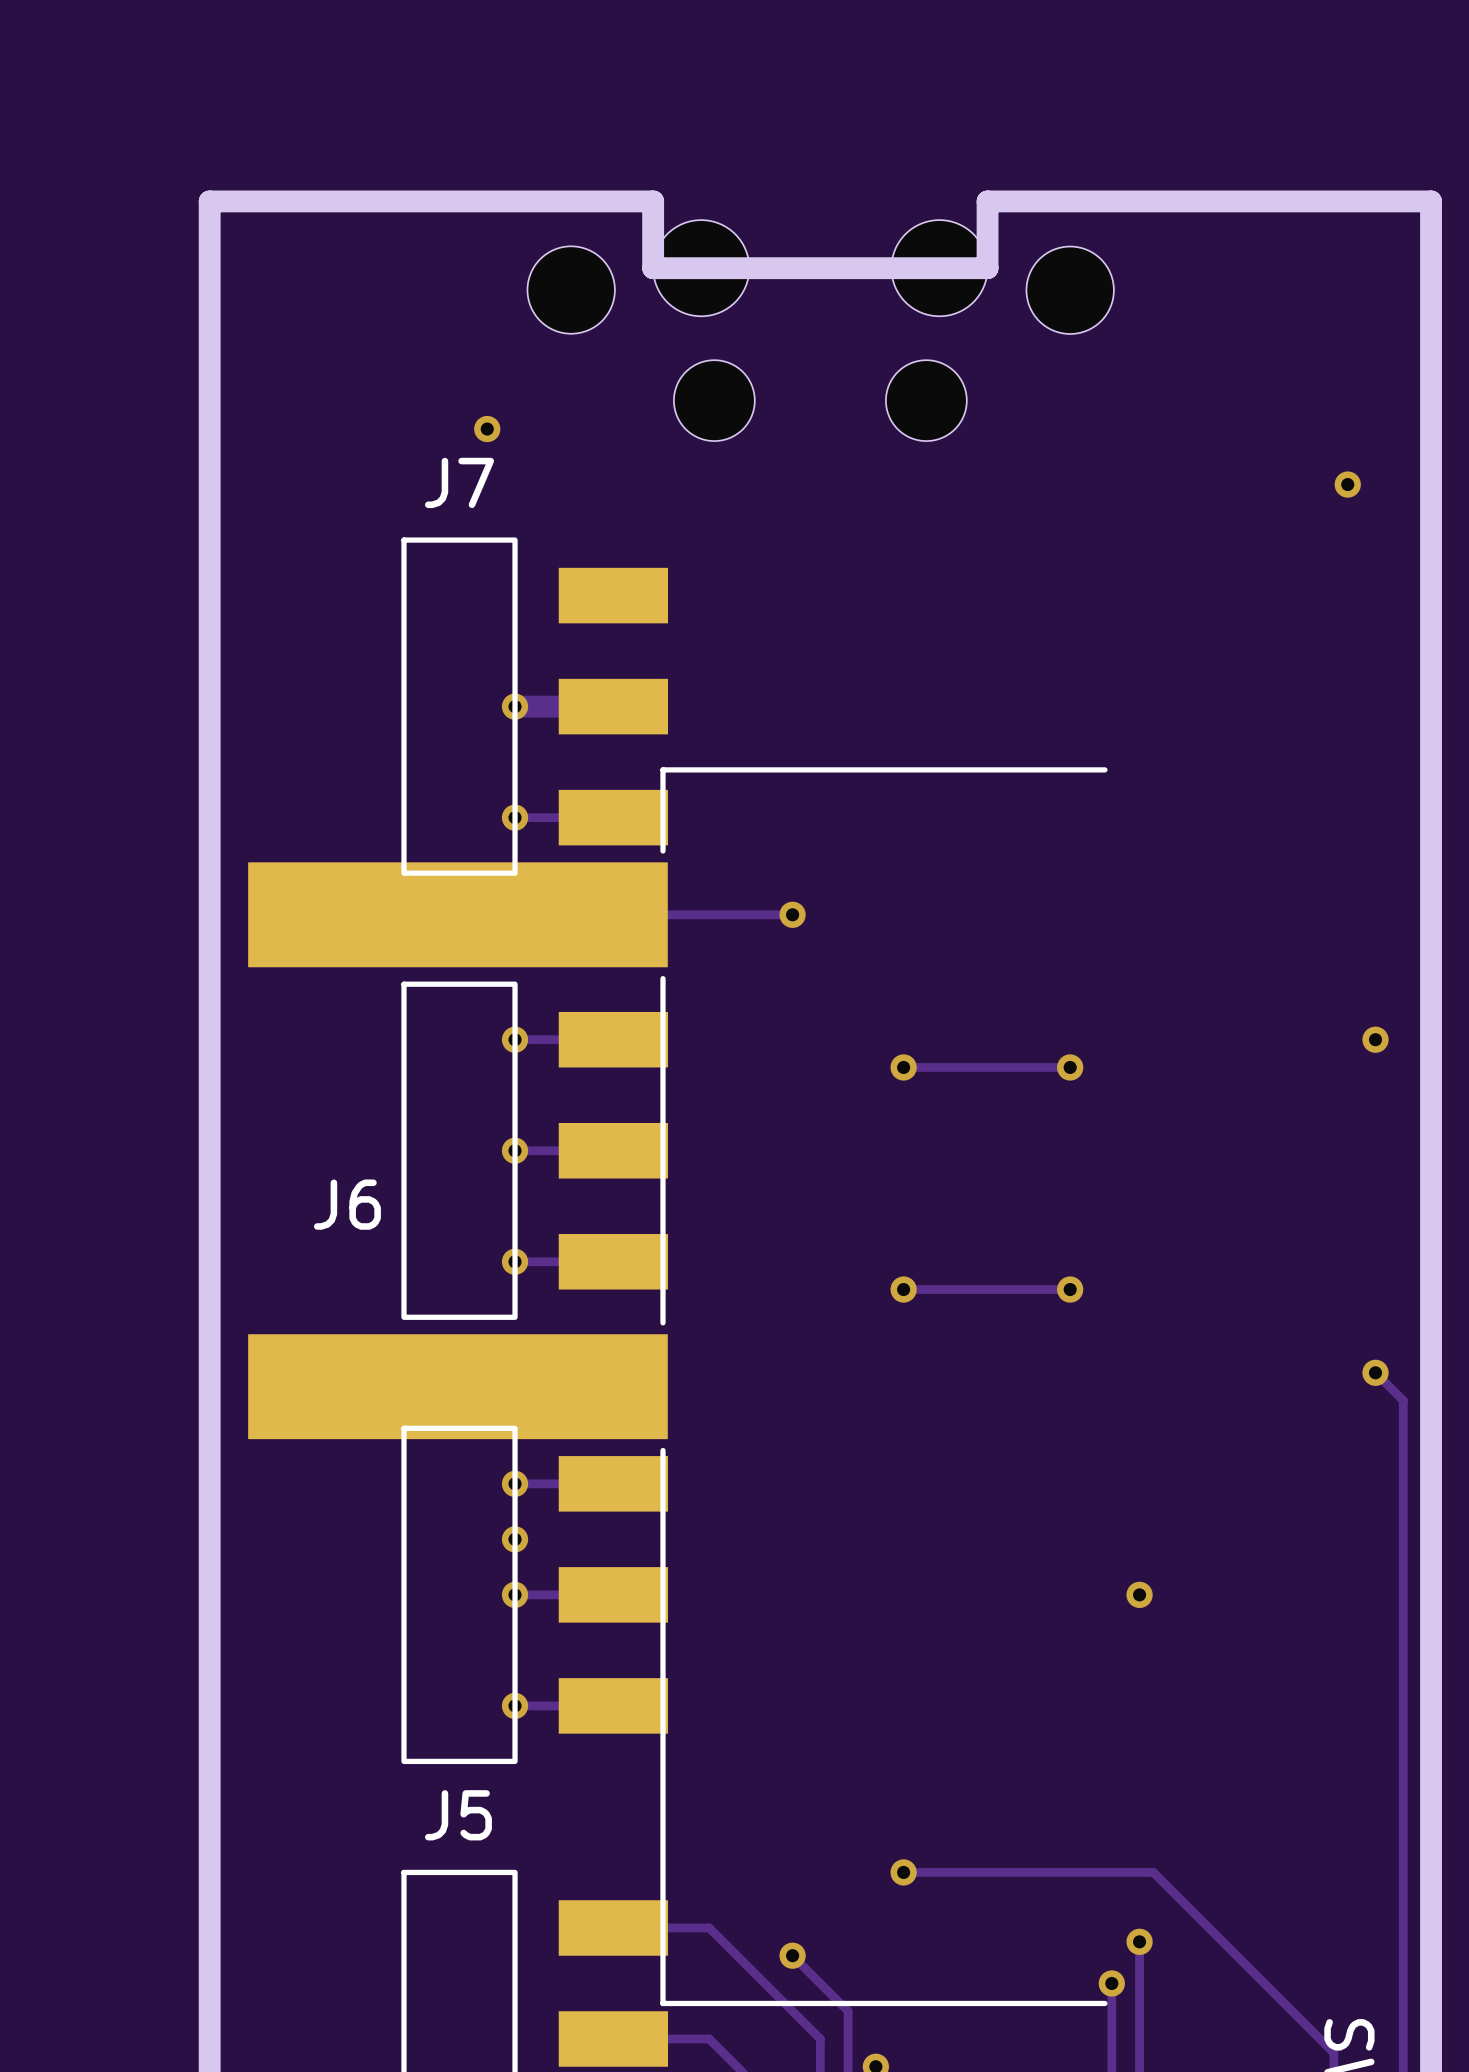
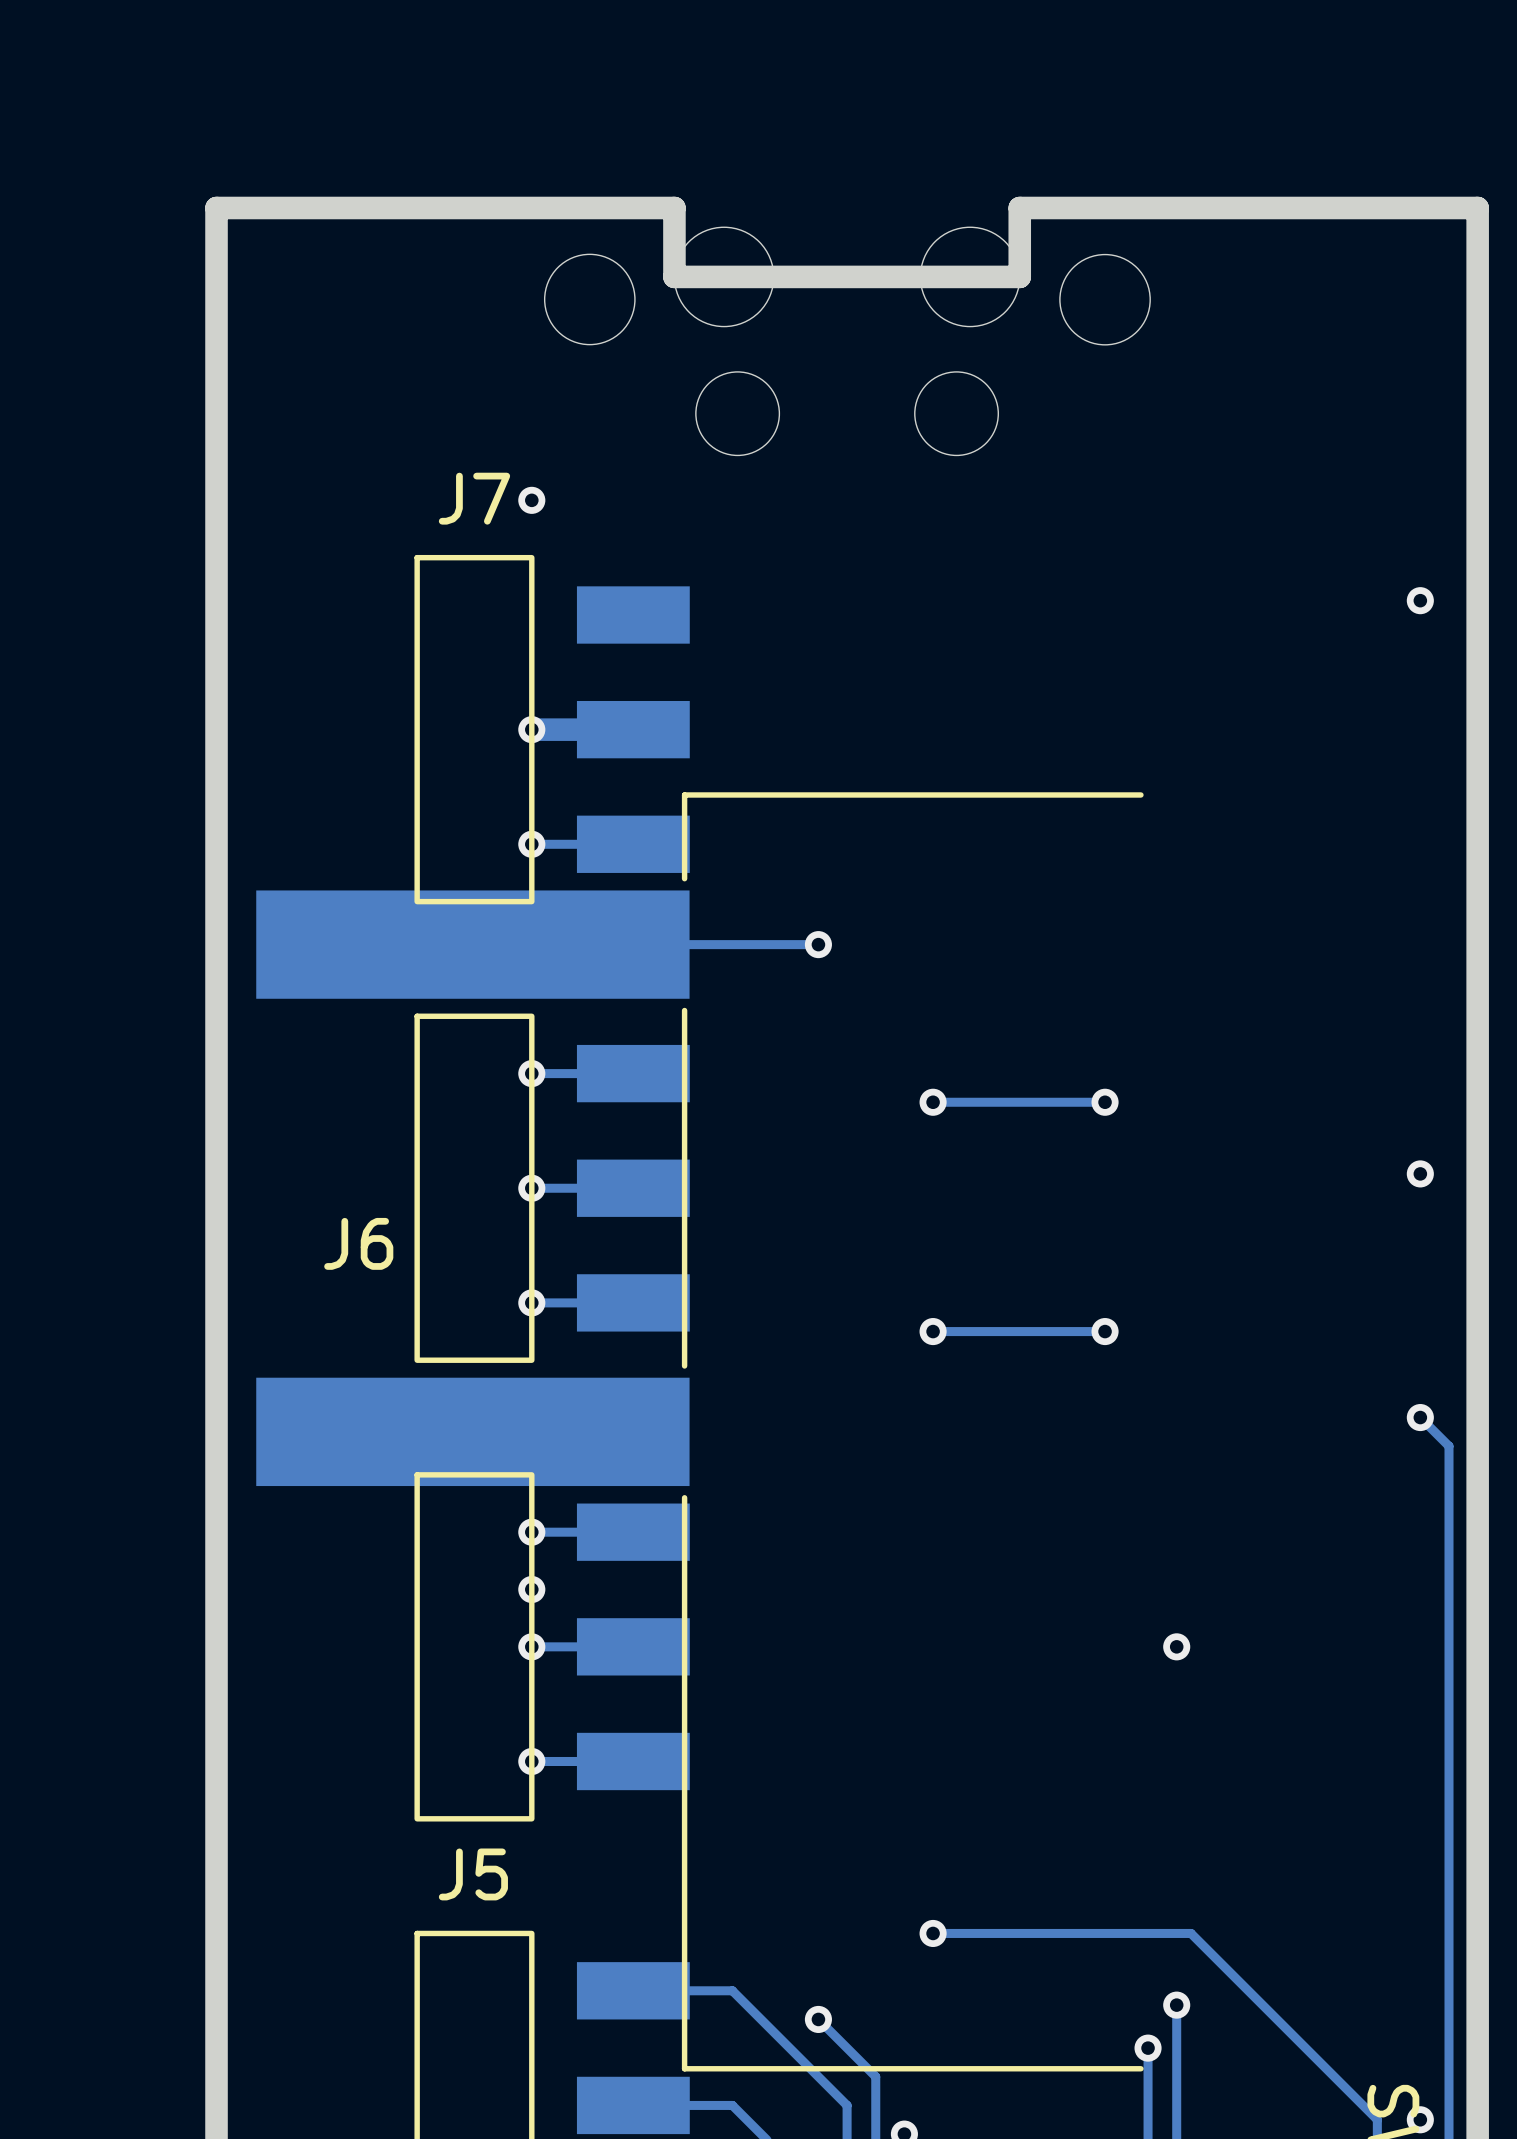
via position: (487, 429) -> (531, 500)
via position: (1347, 484) -> (1420, 600)
via position: (1375, 1039) -> (1420, 1173)
via: none -> (1420, 2119)

